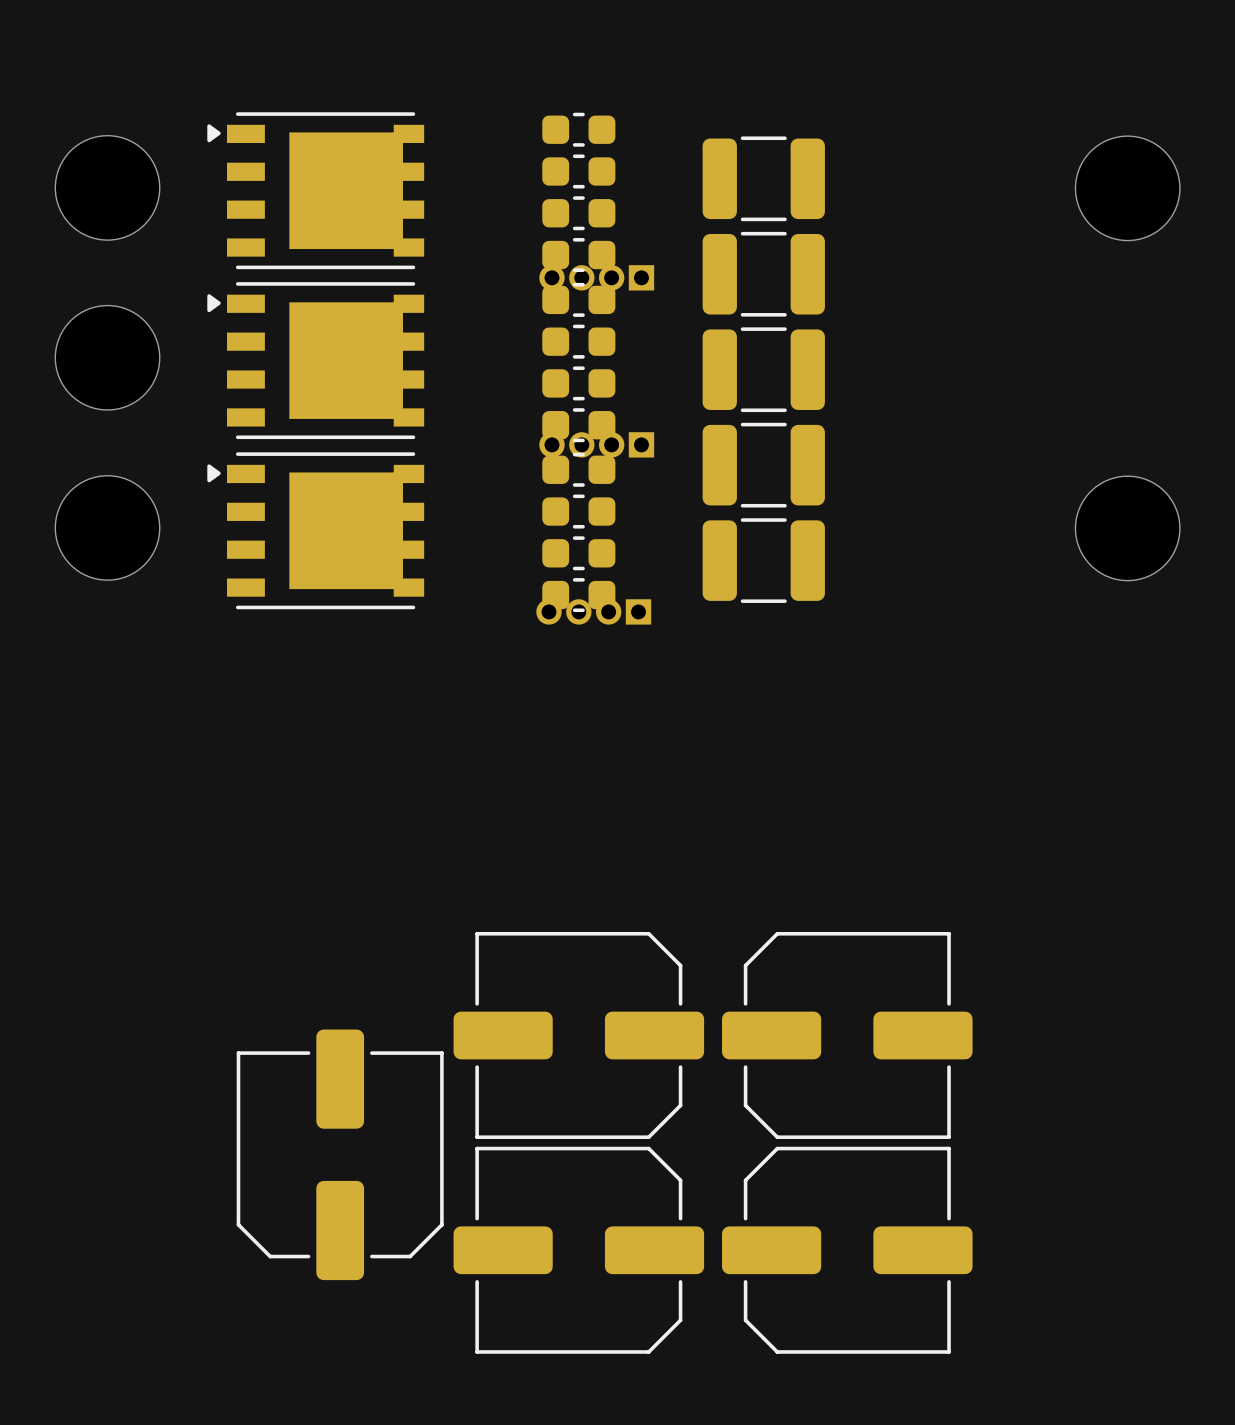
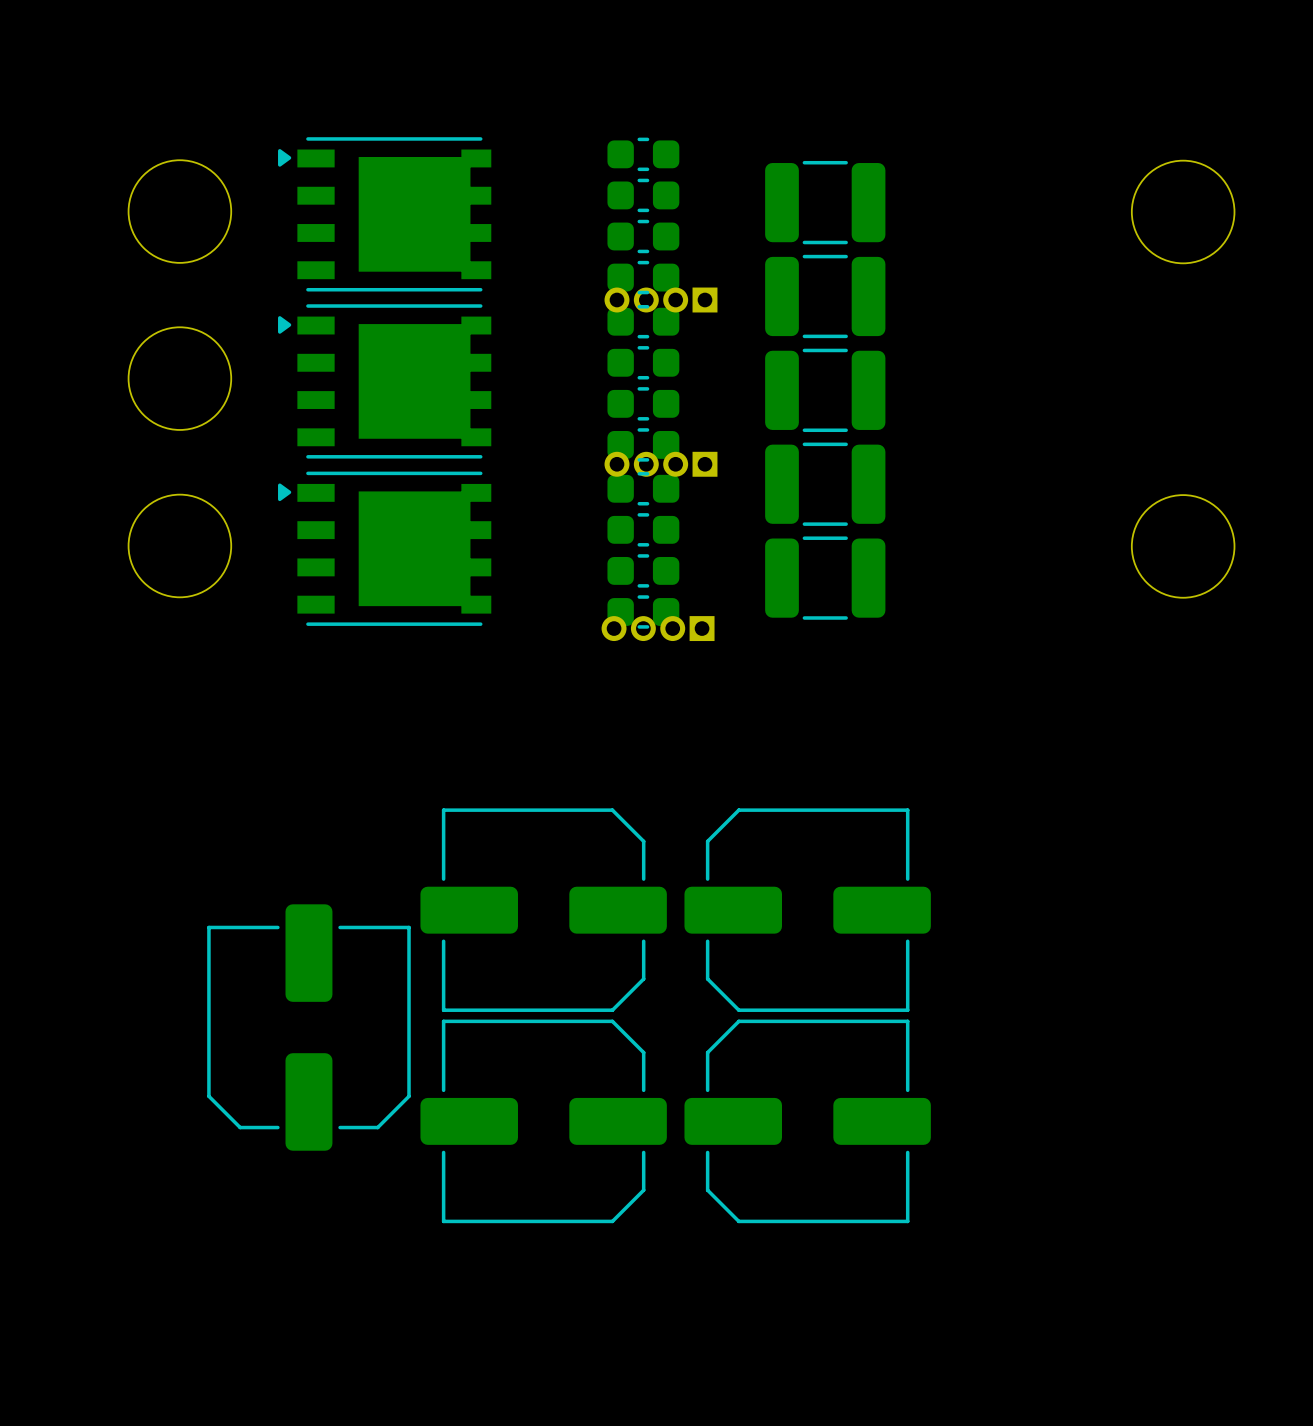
part: none -> (543, 910)
part: none -> (807, 910)
part: none -> (308, 1027)
part: (578, 1035) -> none
part: (847, 1035) -> none
part: none -> (543, 1121)
part: none -> (807, 1121)
part: (340, 1154) -> none
part: (578, 1250) -> none
part: (847, 1250) -> none

